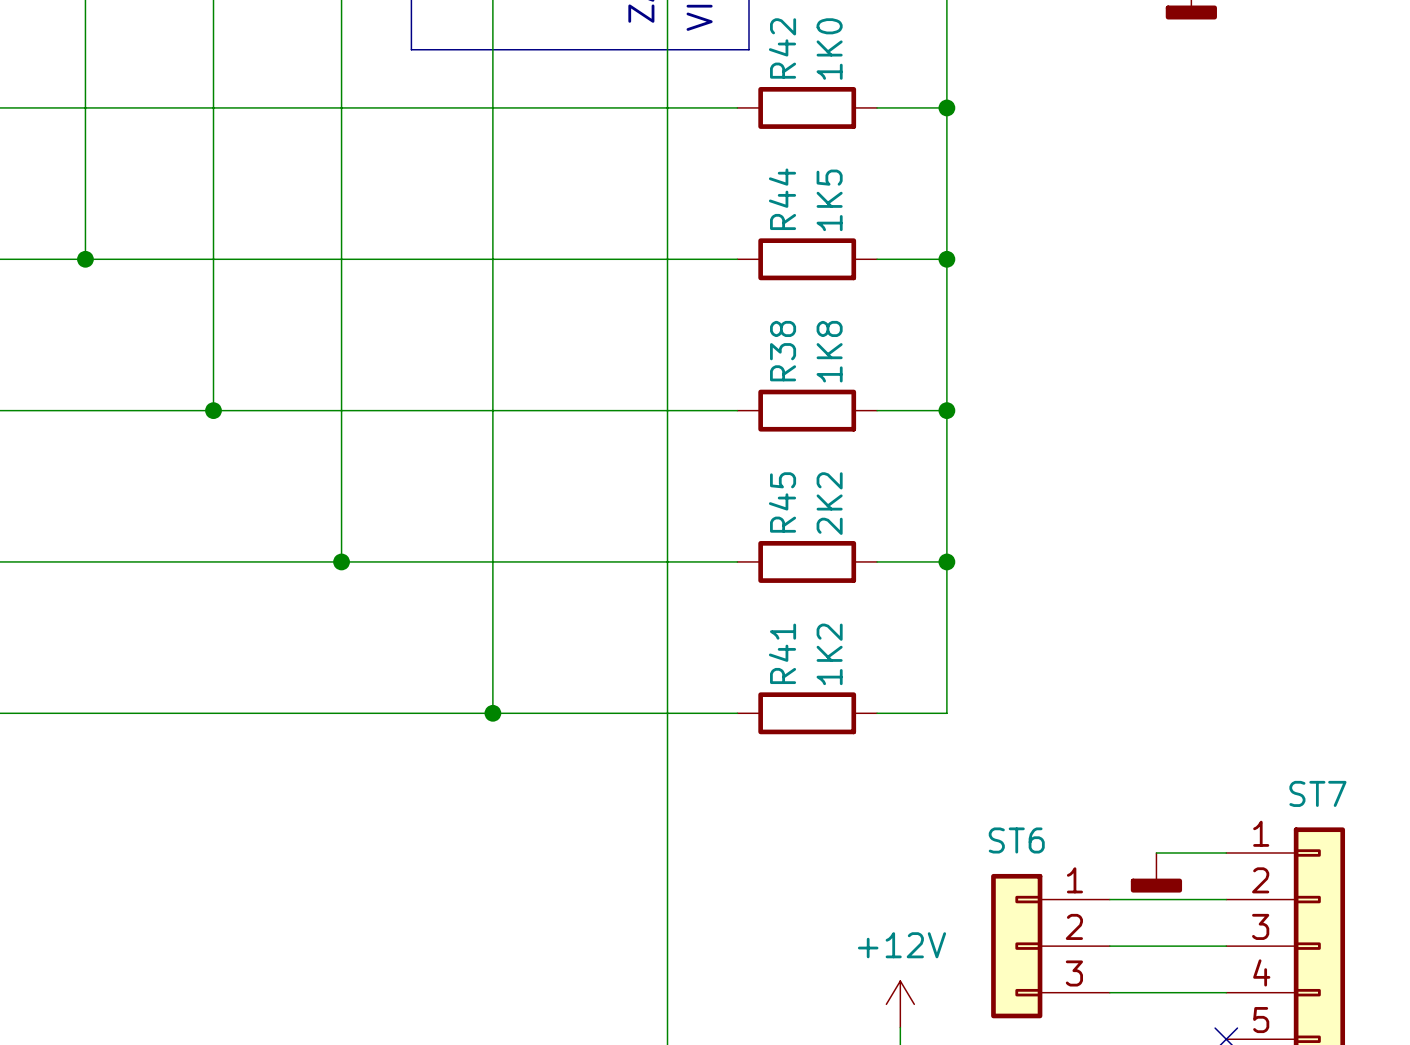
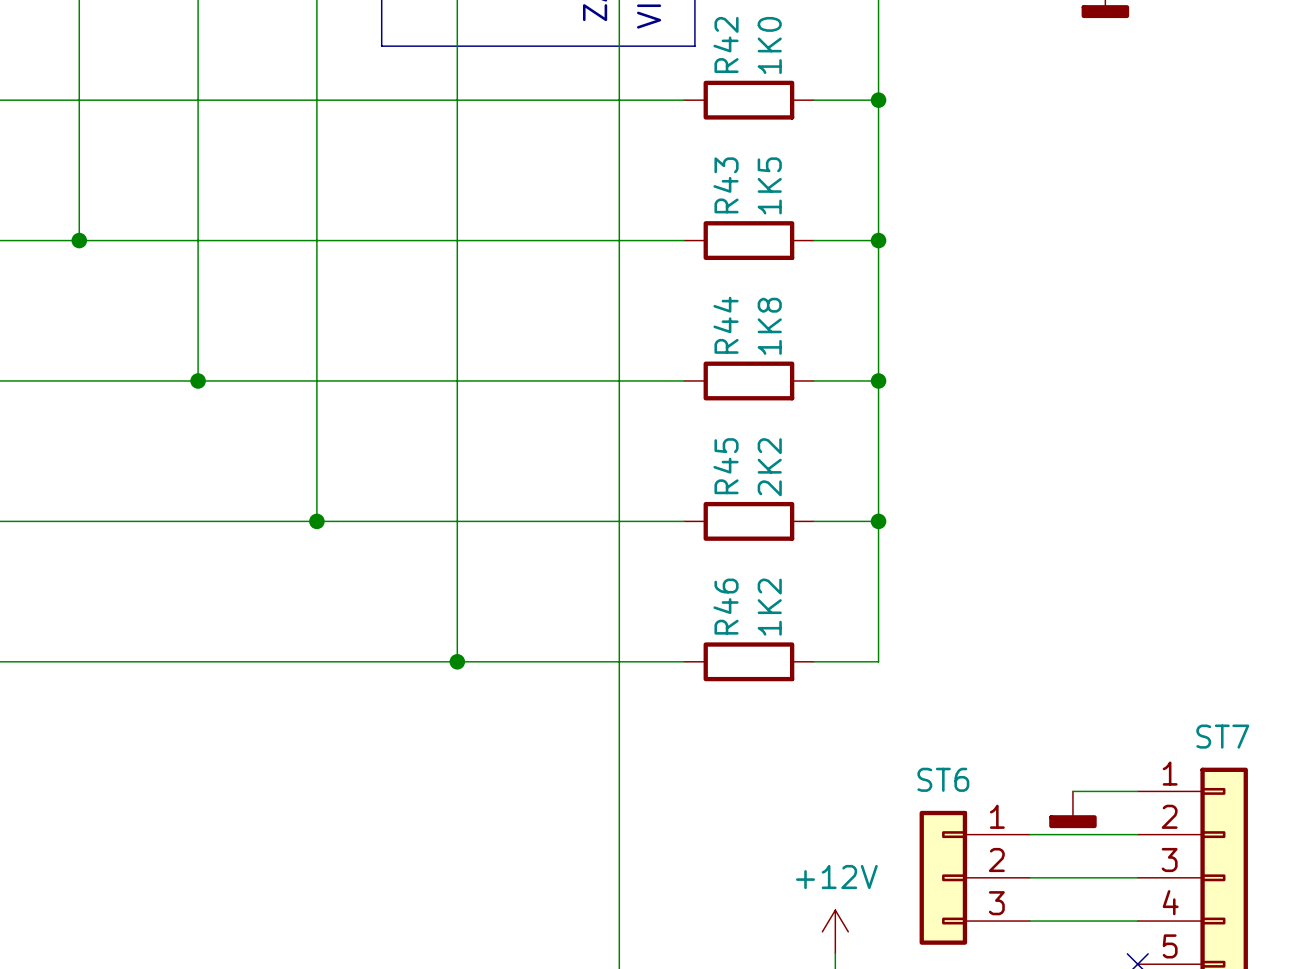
R44 name: R44 (782, 199) -> R43 (726, 185)
R38 name: R38 (783, 351) -> R44 (726, 325)
R41 name: R41 (782, 653) -> R46 (726, 606)

